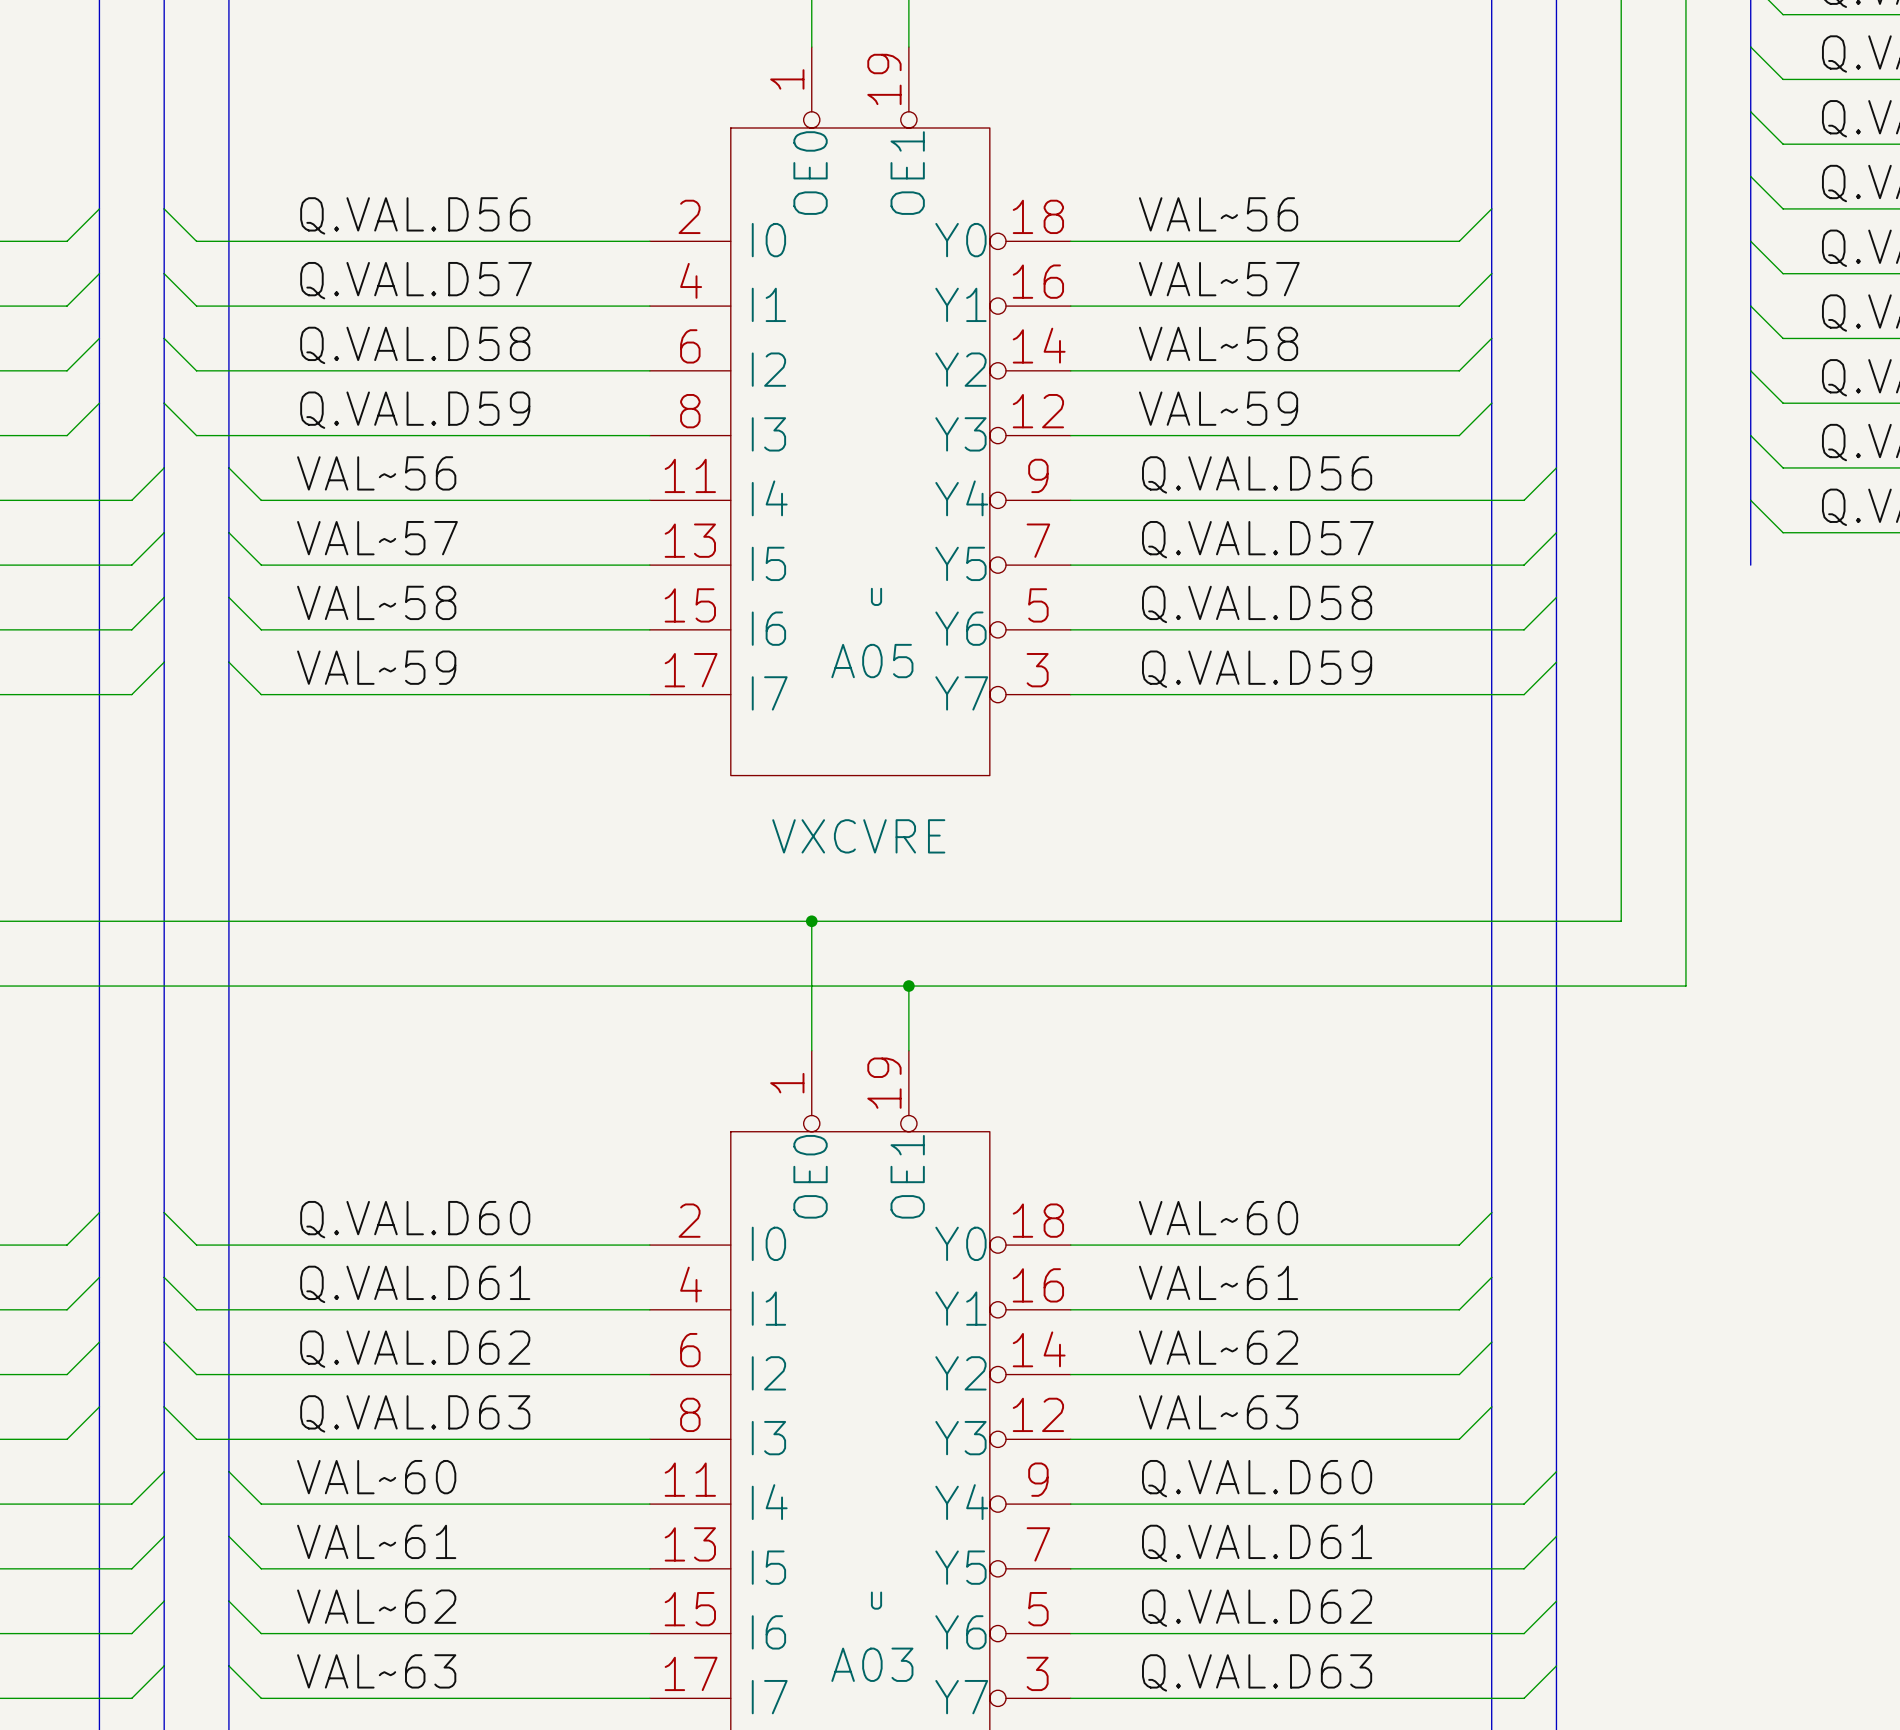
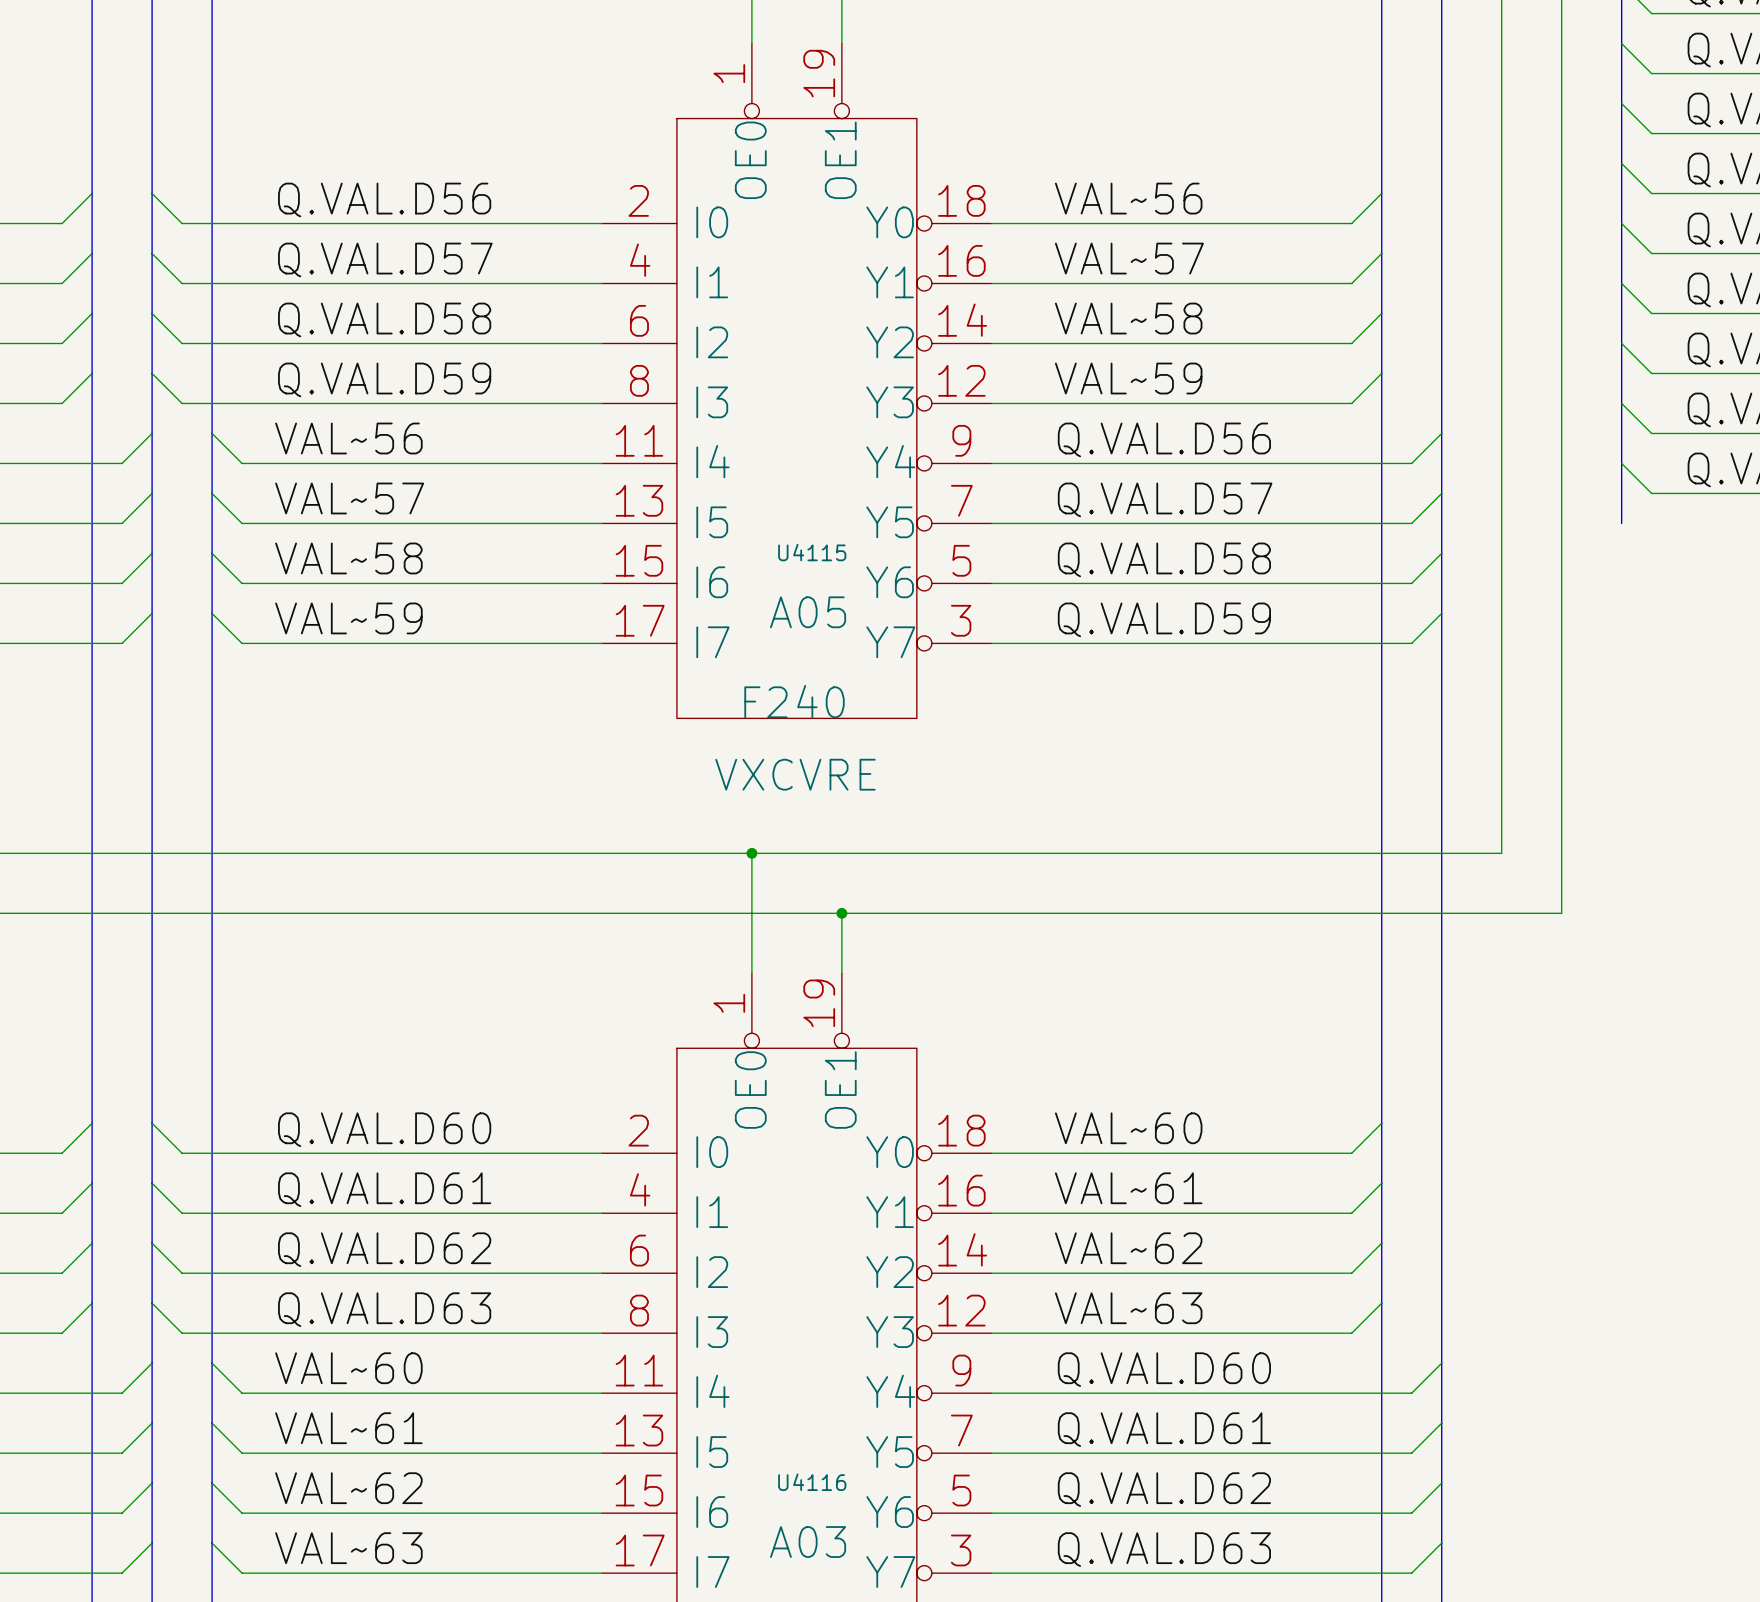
U name: U (876, 596) -> U4115 (812, 552)
U value: none -> F240 (794, 701)
U name: U (876, 1600) -> U4116 (812, 1482)

